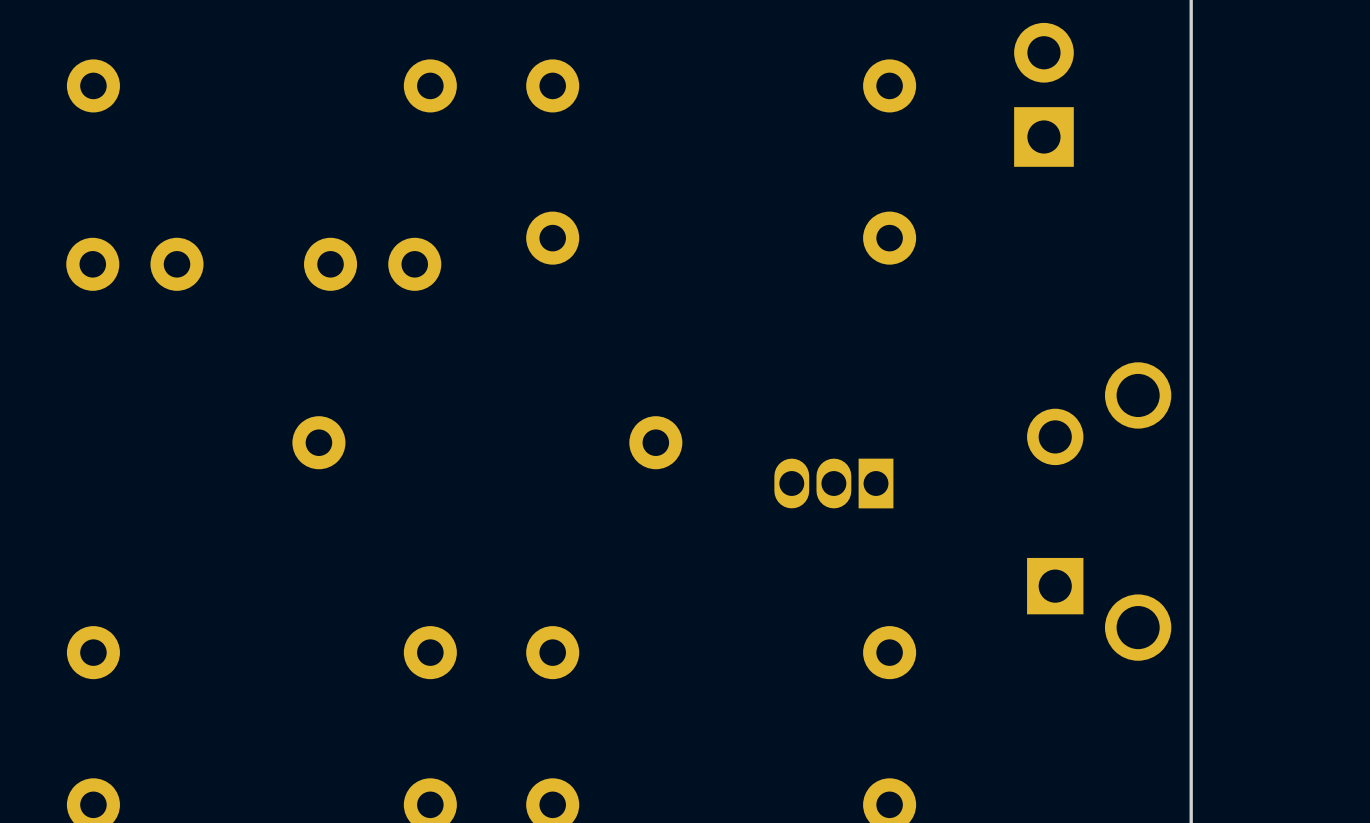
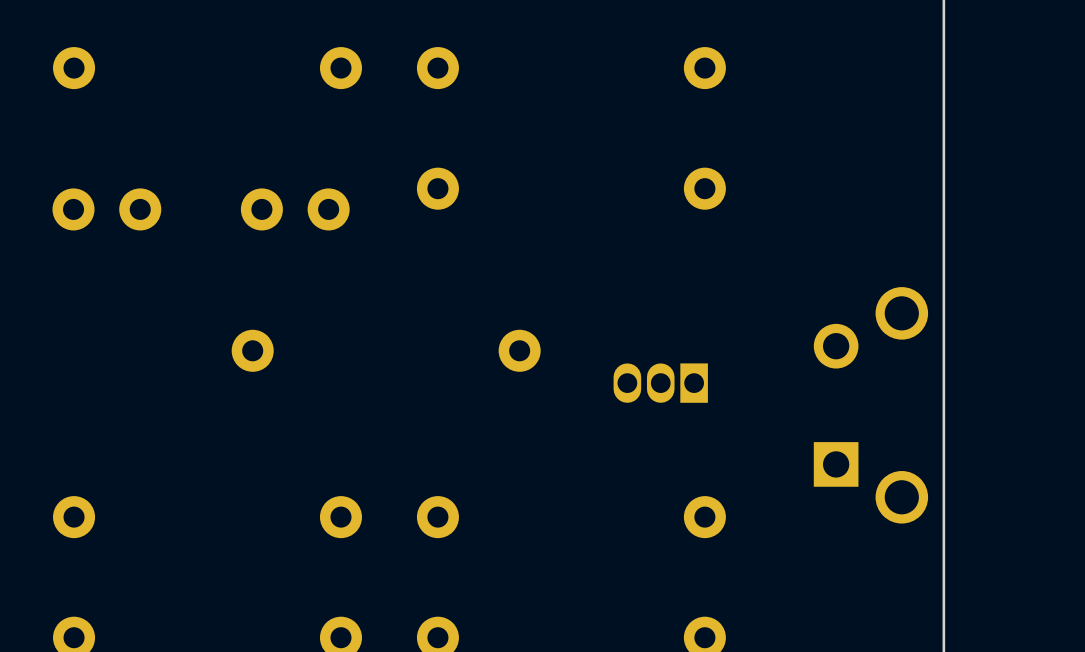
part: (1043, 94) -> none

